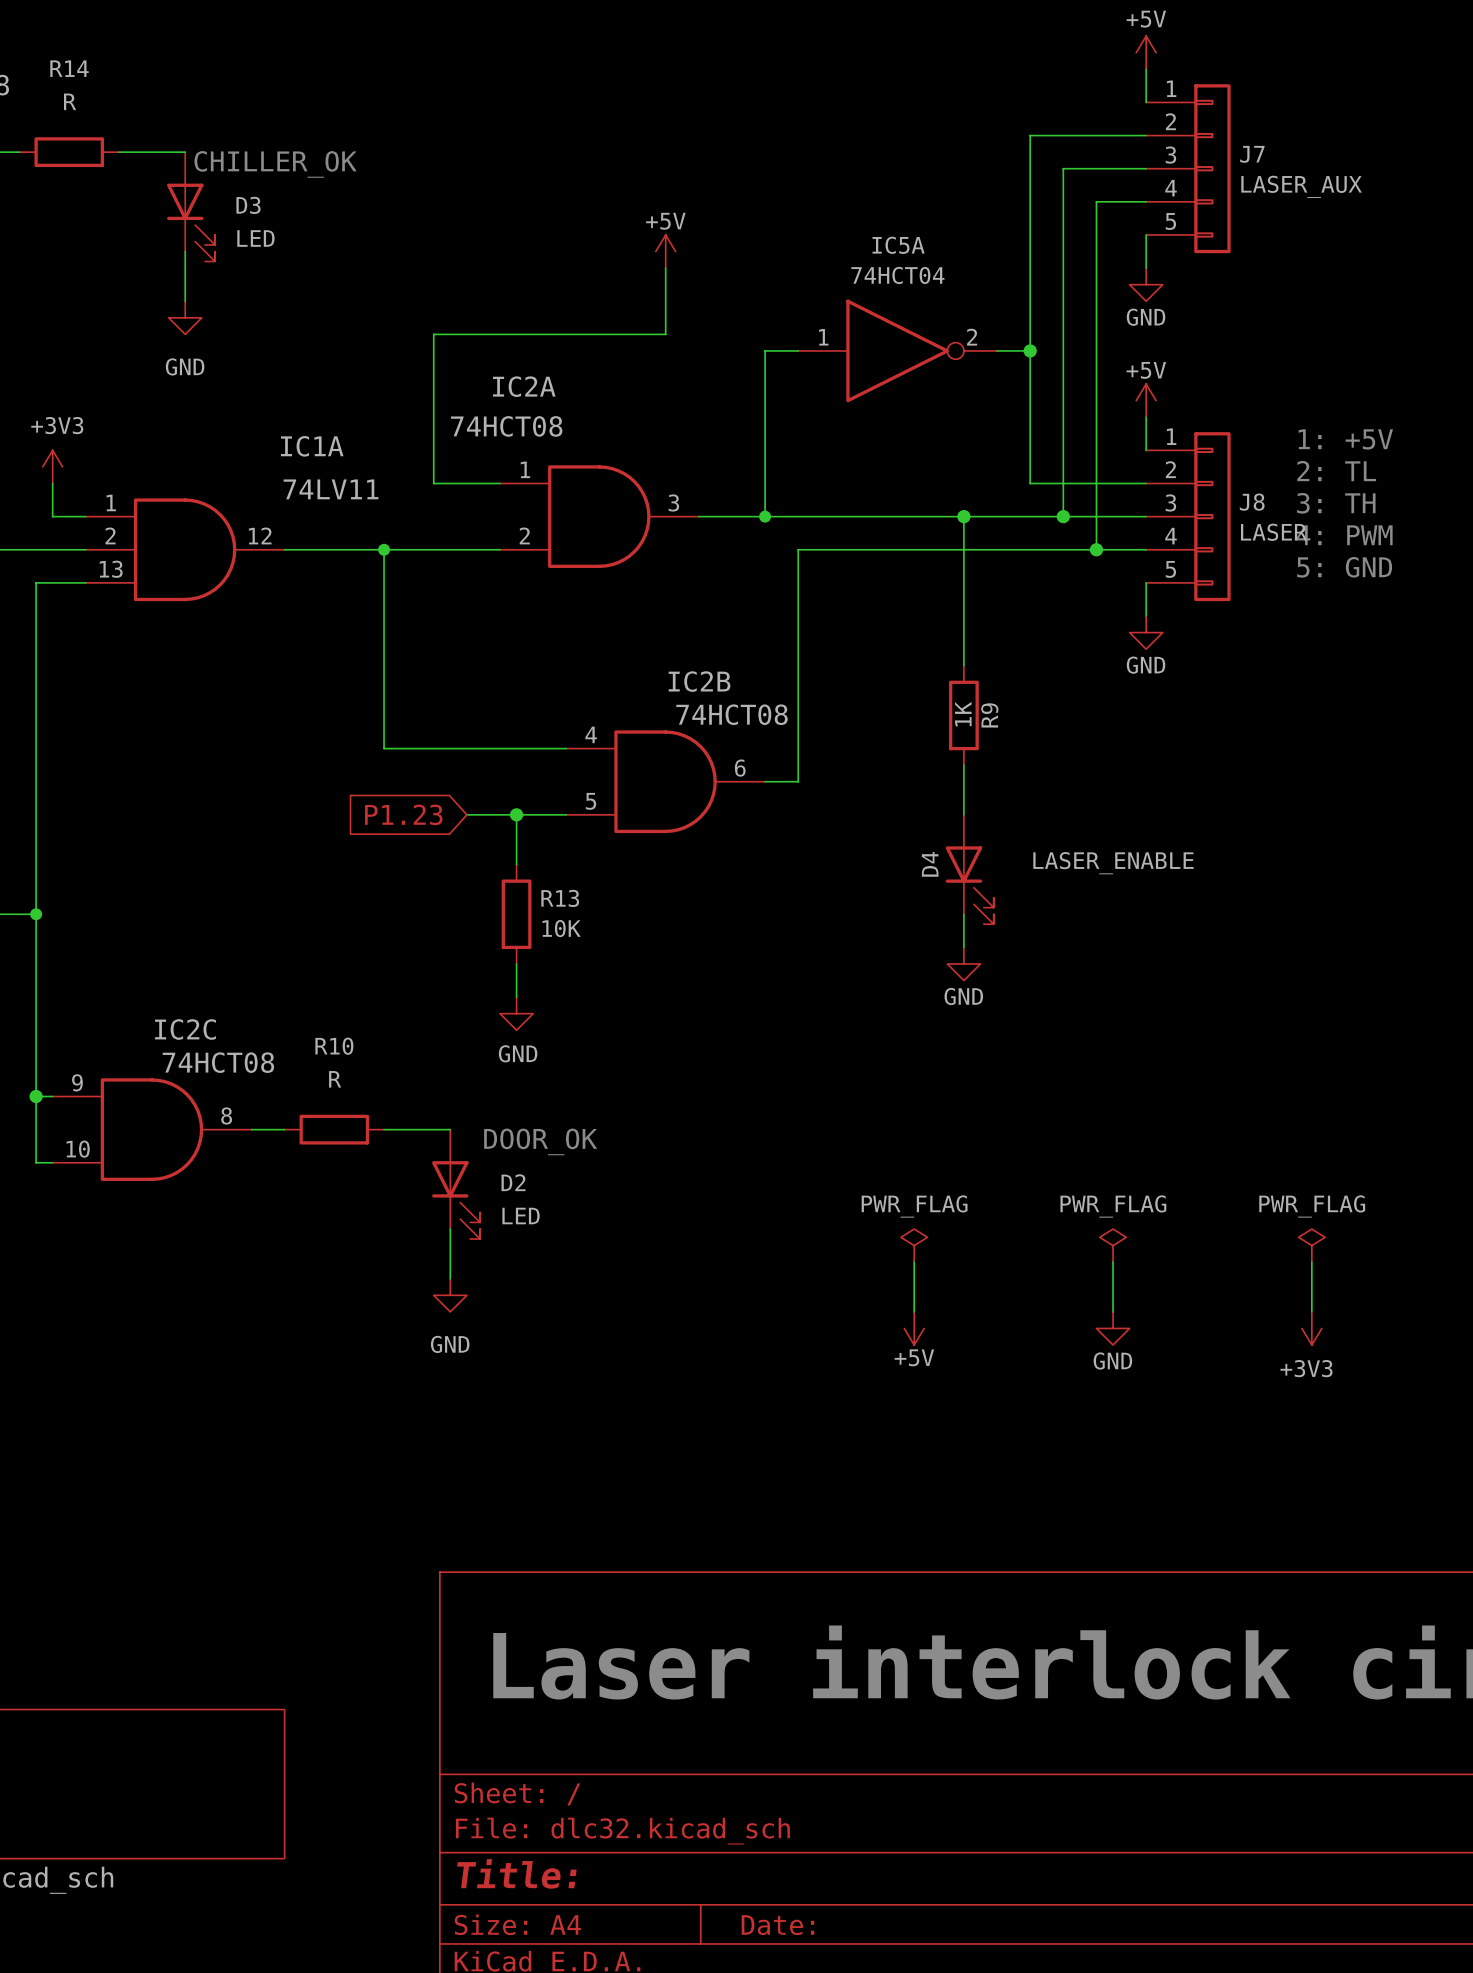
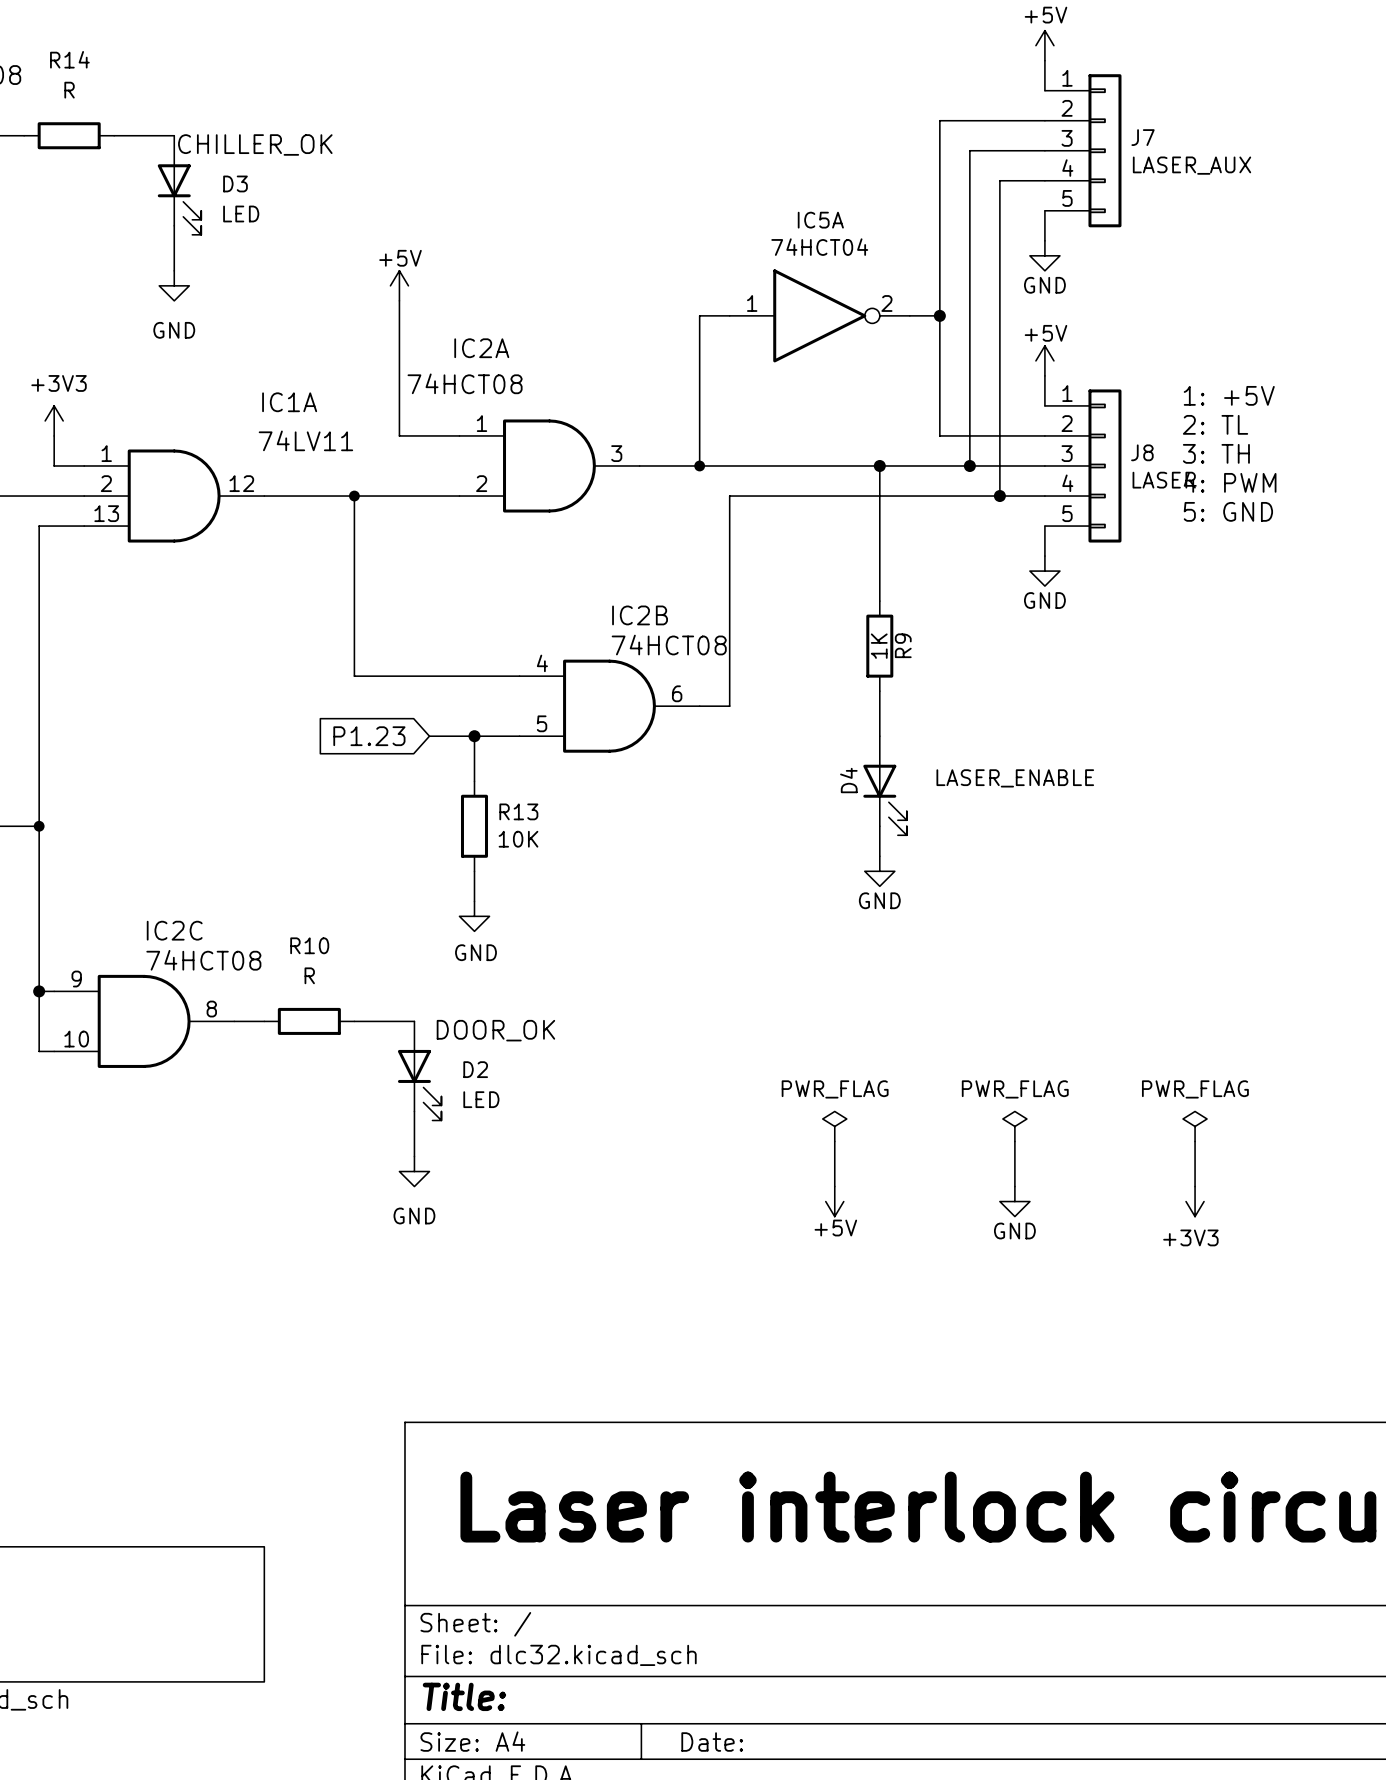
power symbol position: +5V (665, 251) -> +5V (399, 285)
wire: (665, 268) (665, 334) (433, 334) -> none

